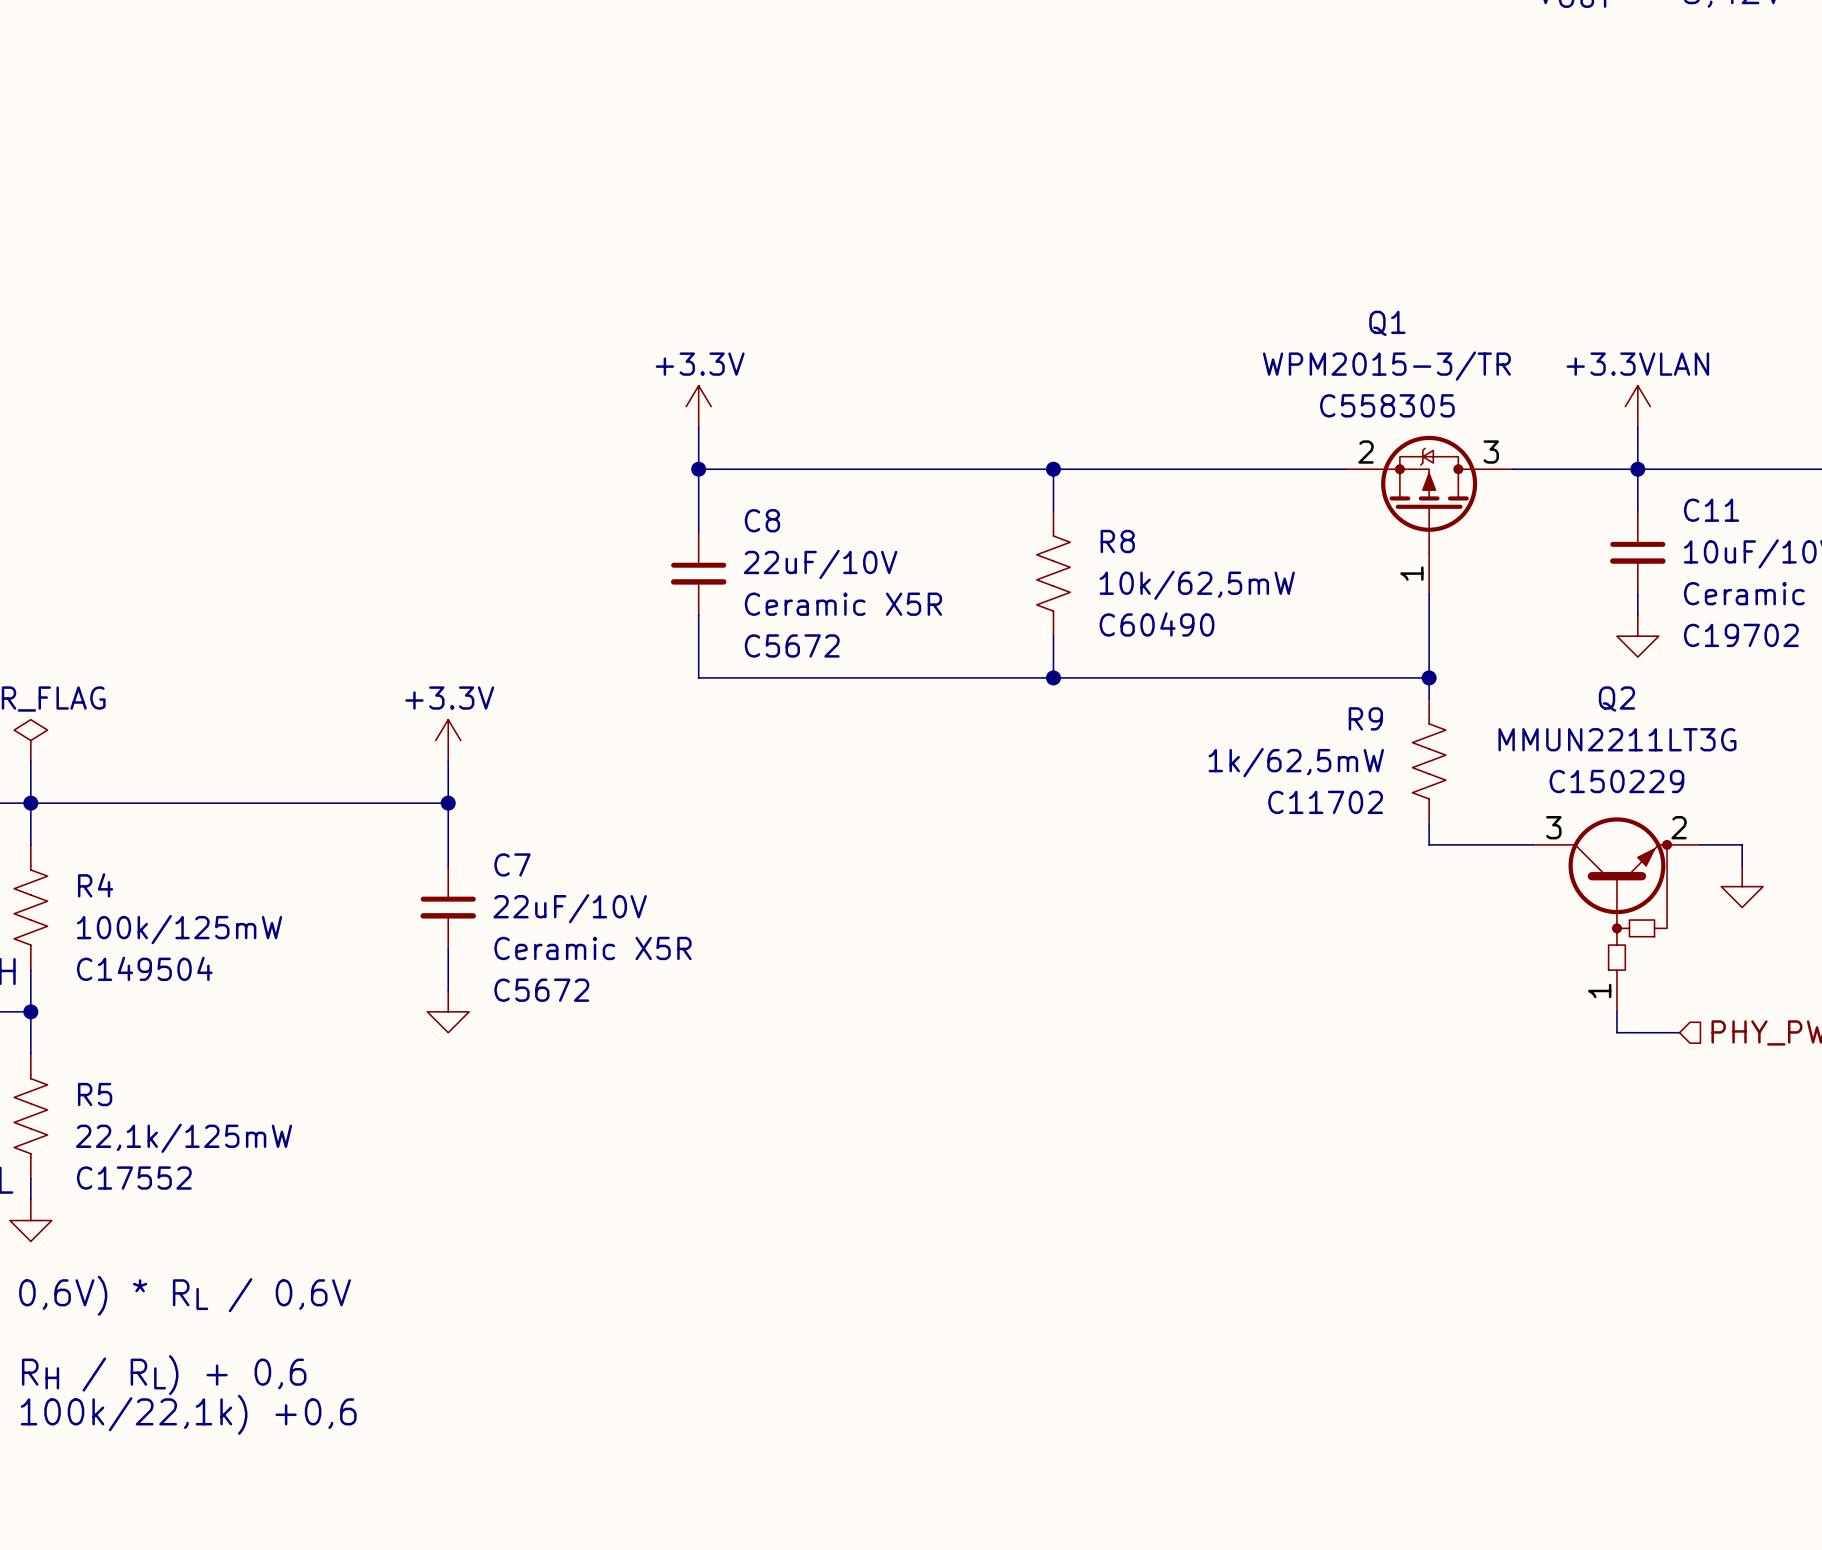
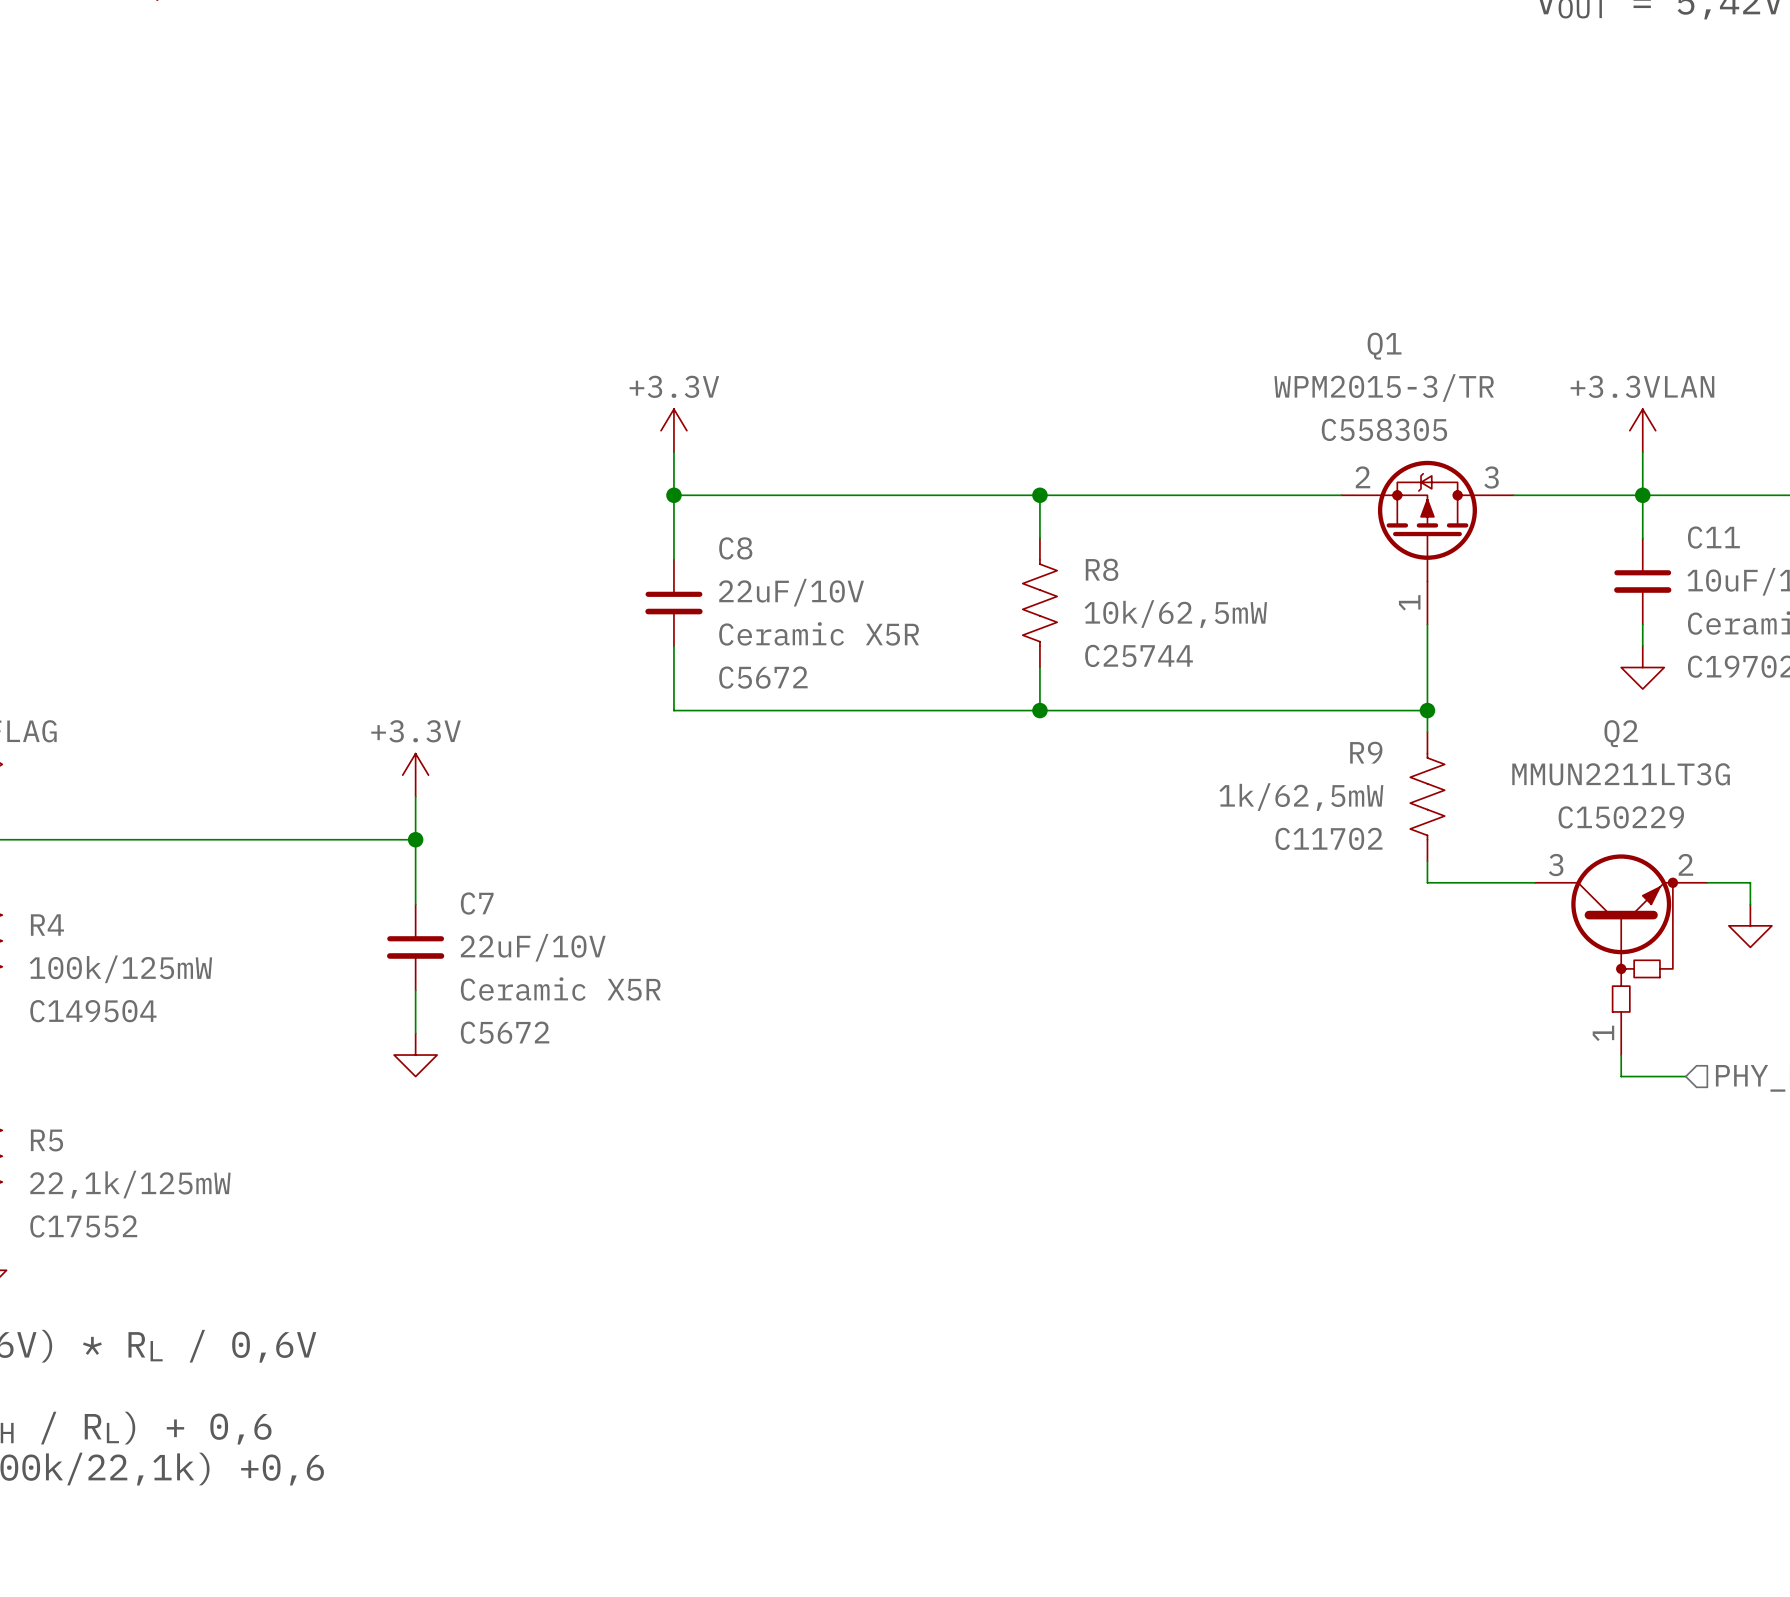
R8 text: C60490 (1156, 624) -> C25744 (1139, 655)
Q2 symbol: [1533, 817, 1701, 1012] -> [1535, 854, 1708, 1056]

